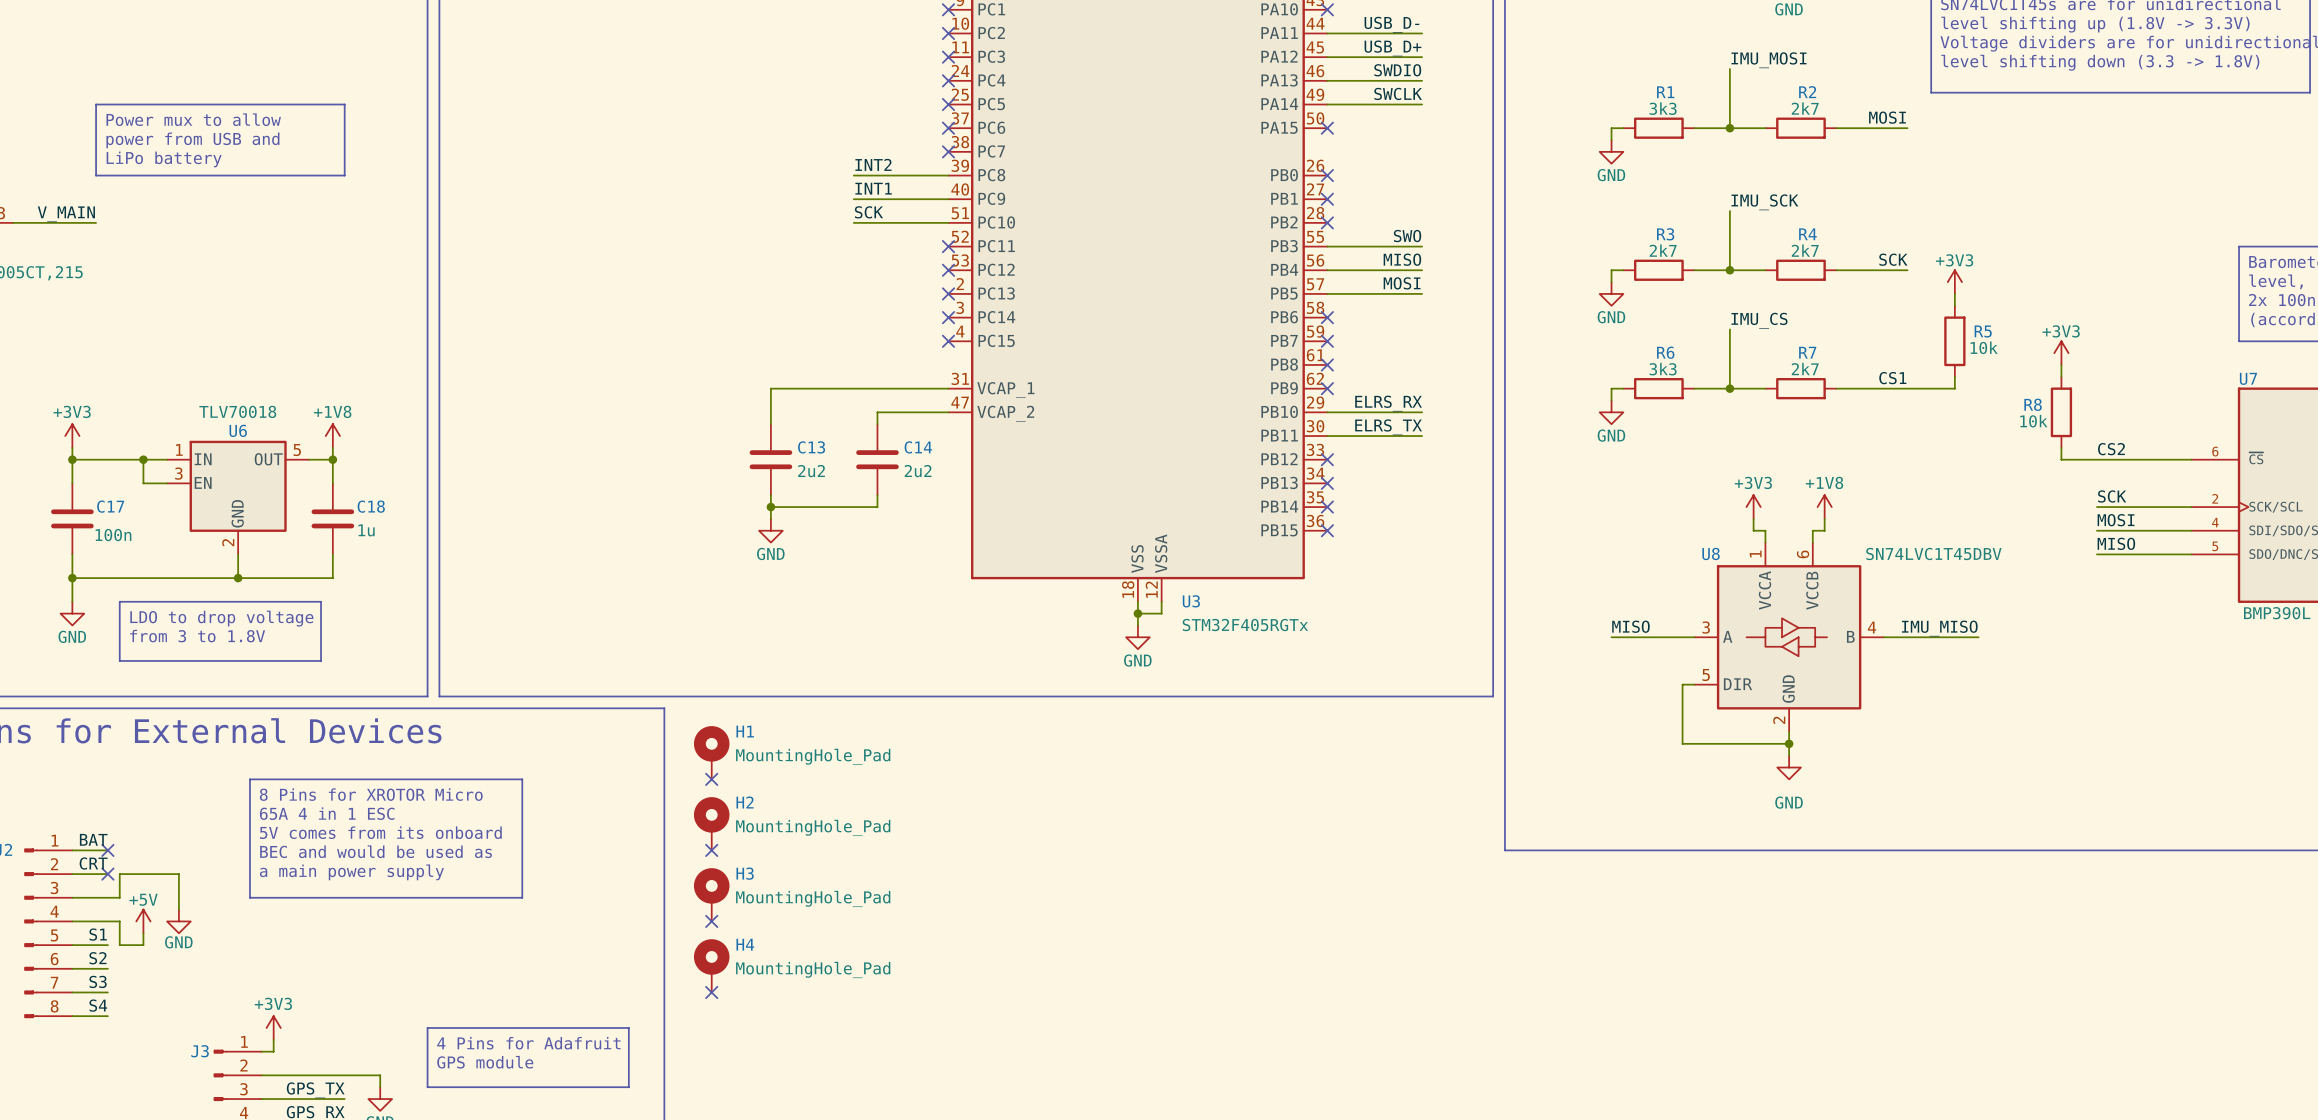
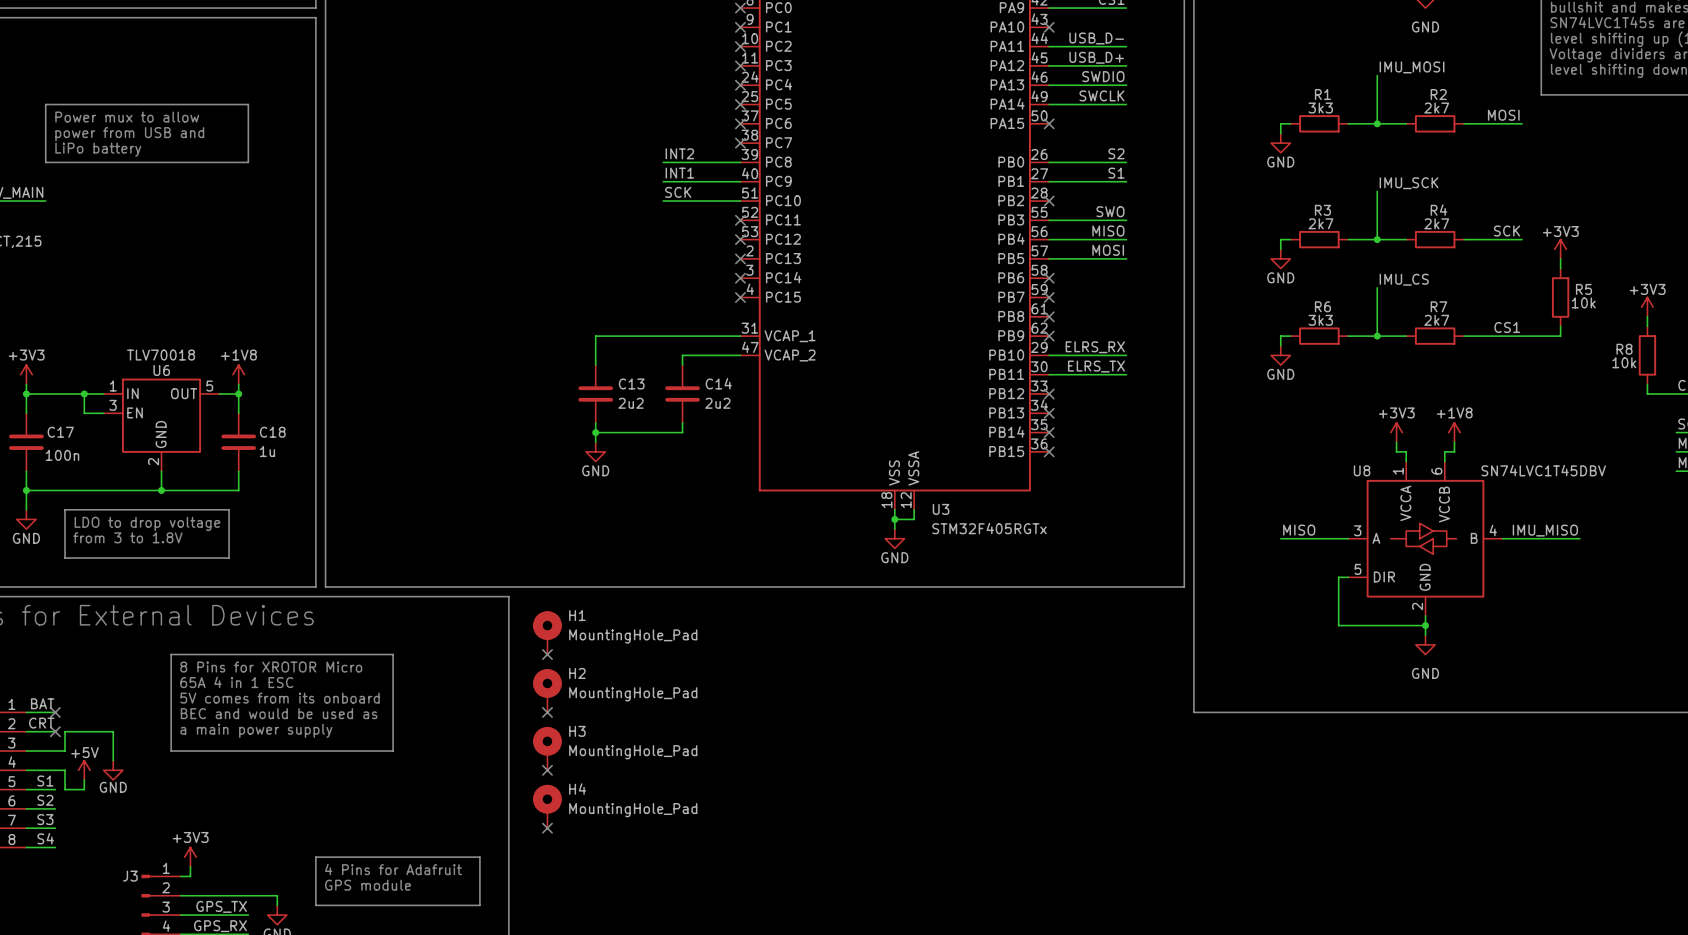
label: none -> S2 (1116, 153)
wire: none -> (1049, 162) (1126, 162)
no-connect mark: (1327, 175) -> none
label: none -> S1 (1116, 173)
wire: none -> (1049, 181) (1126, 181)
no-connect mark: (1327, 199) -> none

